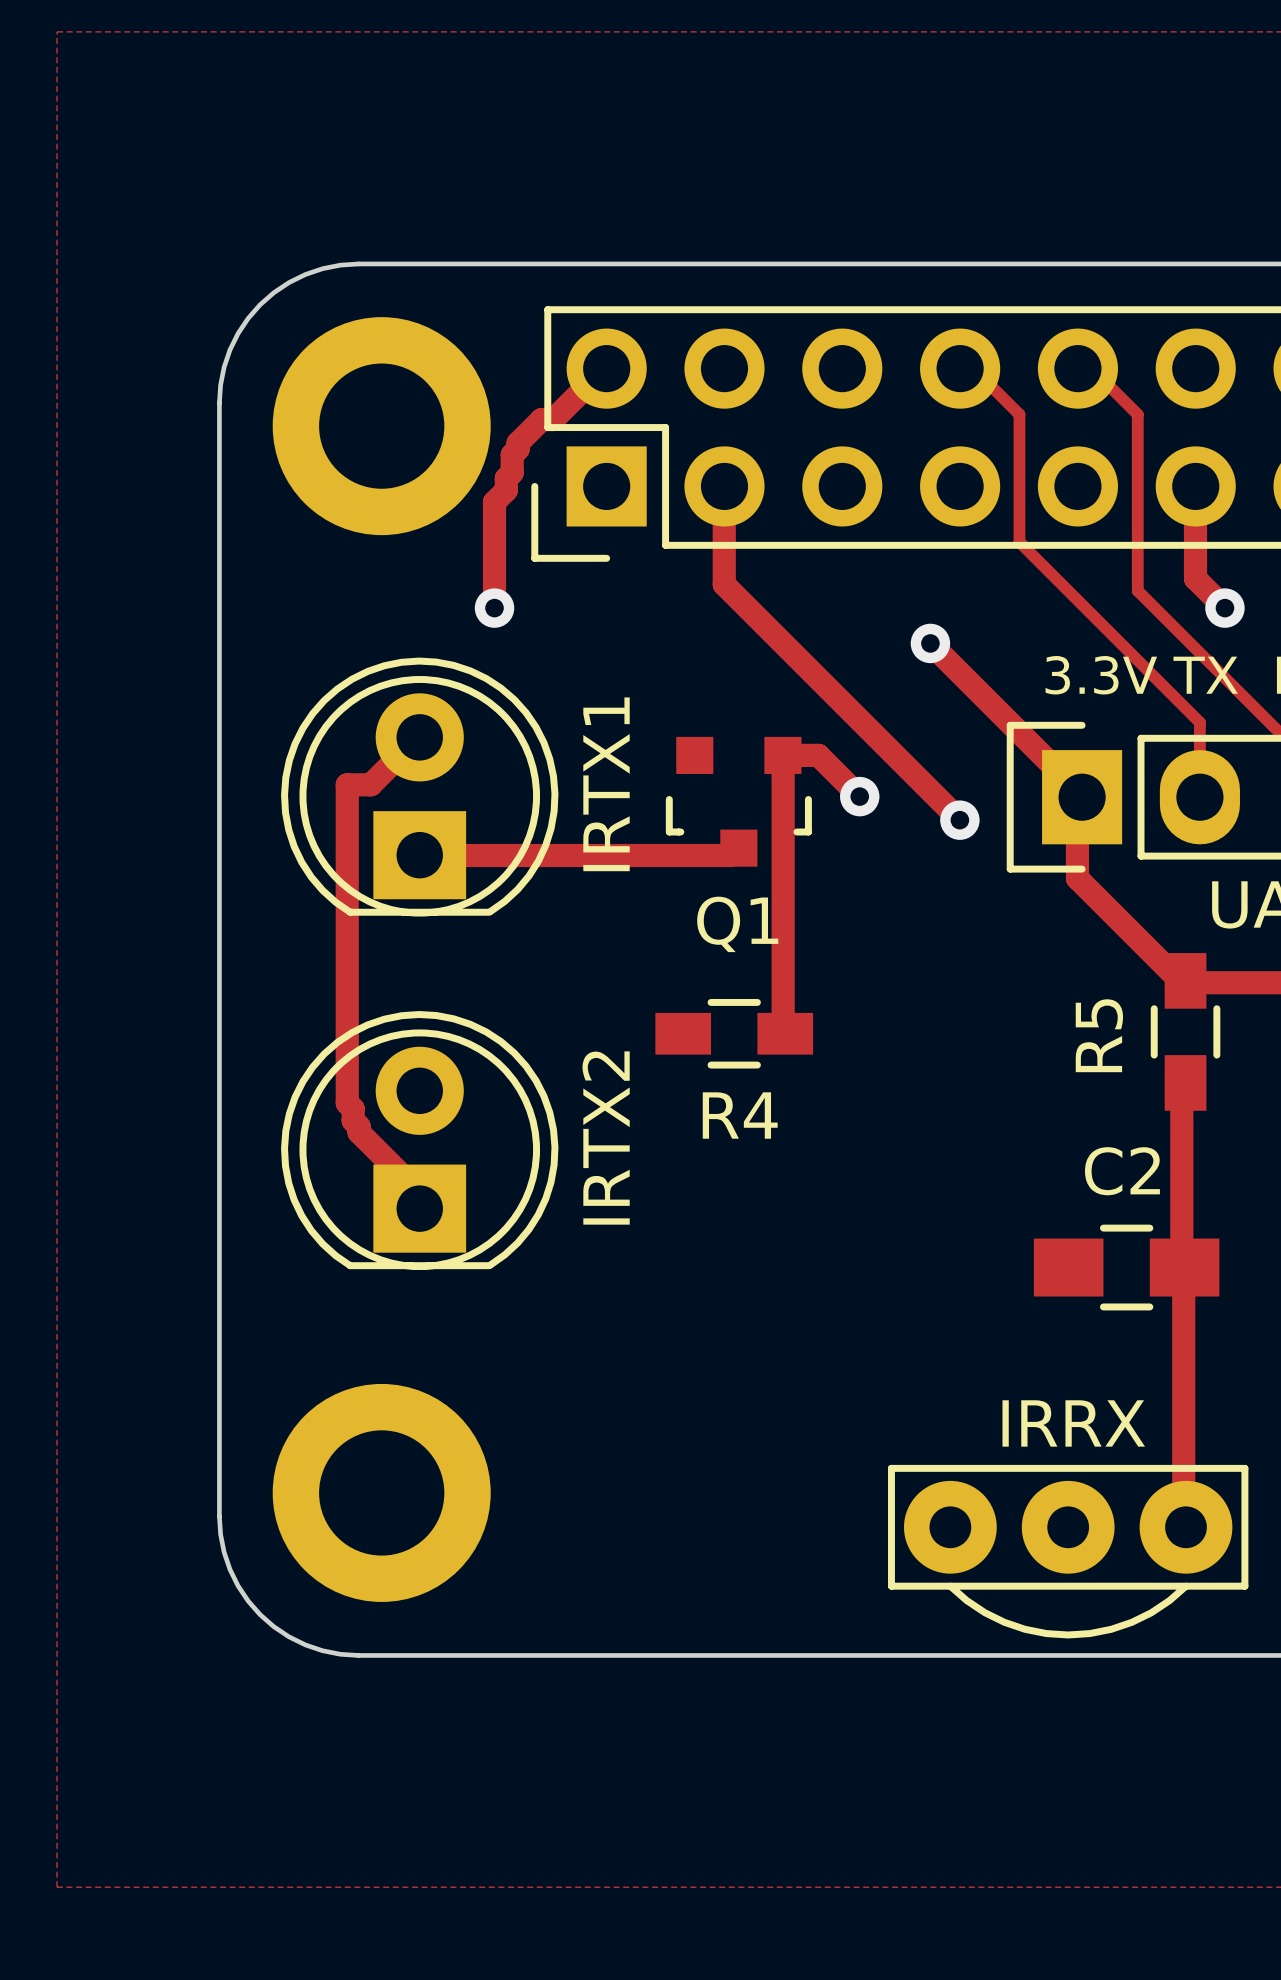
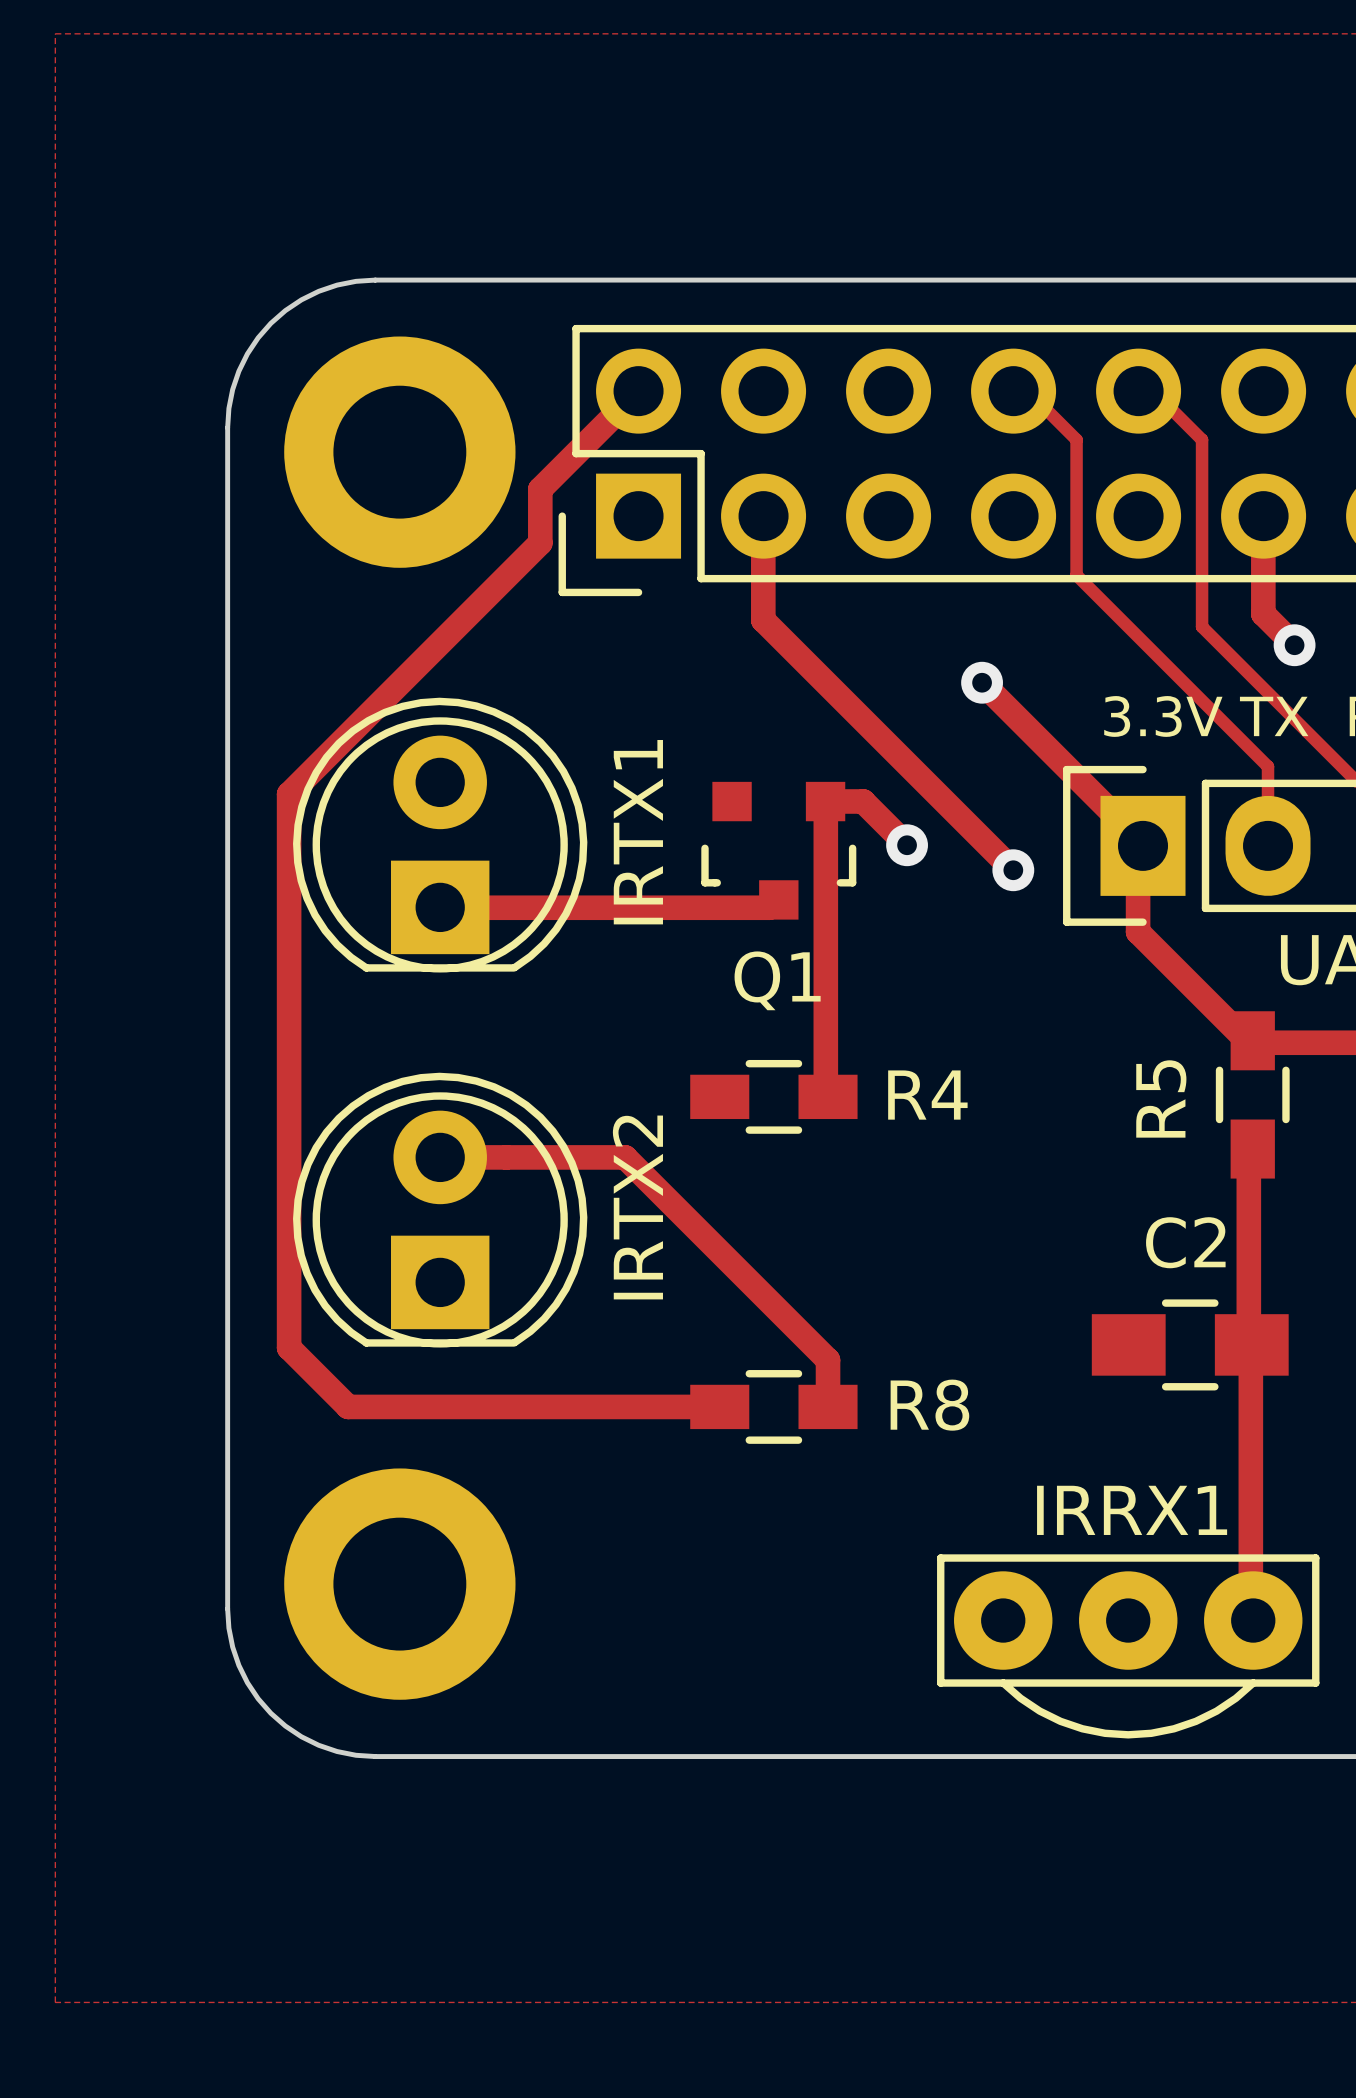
track: (606, 366) (553, 419) (541, 419) (518, 443) (518, 449) (512, 454) (512, 472) (506, 478) (506, 490) (494, 502) (494, 608) -> none
track: none -> (638, 391) (540, 489) (540, 543) (289, 794) (289, 1347) (348, 1406) (719, 1406)
via: (494, 608) -> none
track: (417, 737) (370, 784) (347, 784) (347, 1102) (353, 1108) (353, 1120) (359, 1126) (359, 1132) (417, 1191) -> none
track: none -> (440, 1157) (625, 1157) (828, 1360) (828, 1406)
R4 name position: R4 (740, 1115) -> R4 (927, 1095)
R8: none -> (773, 1406)
IRRX name: IRRX (1073, 1423) -> IRRX1 (1132, 1510)

